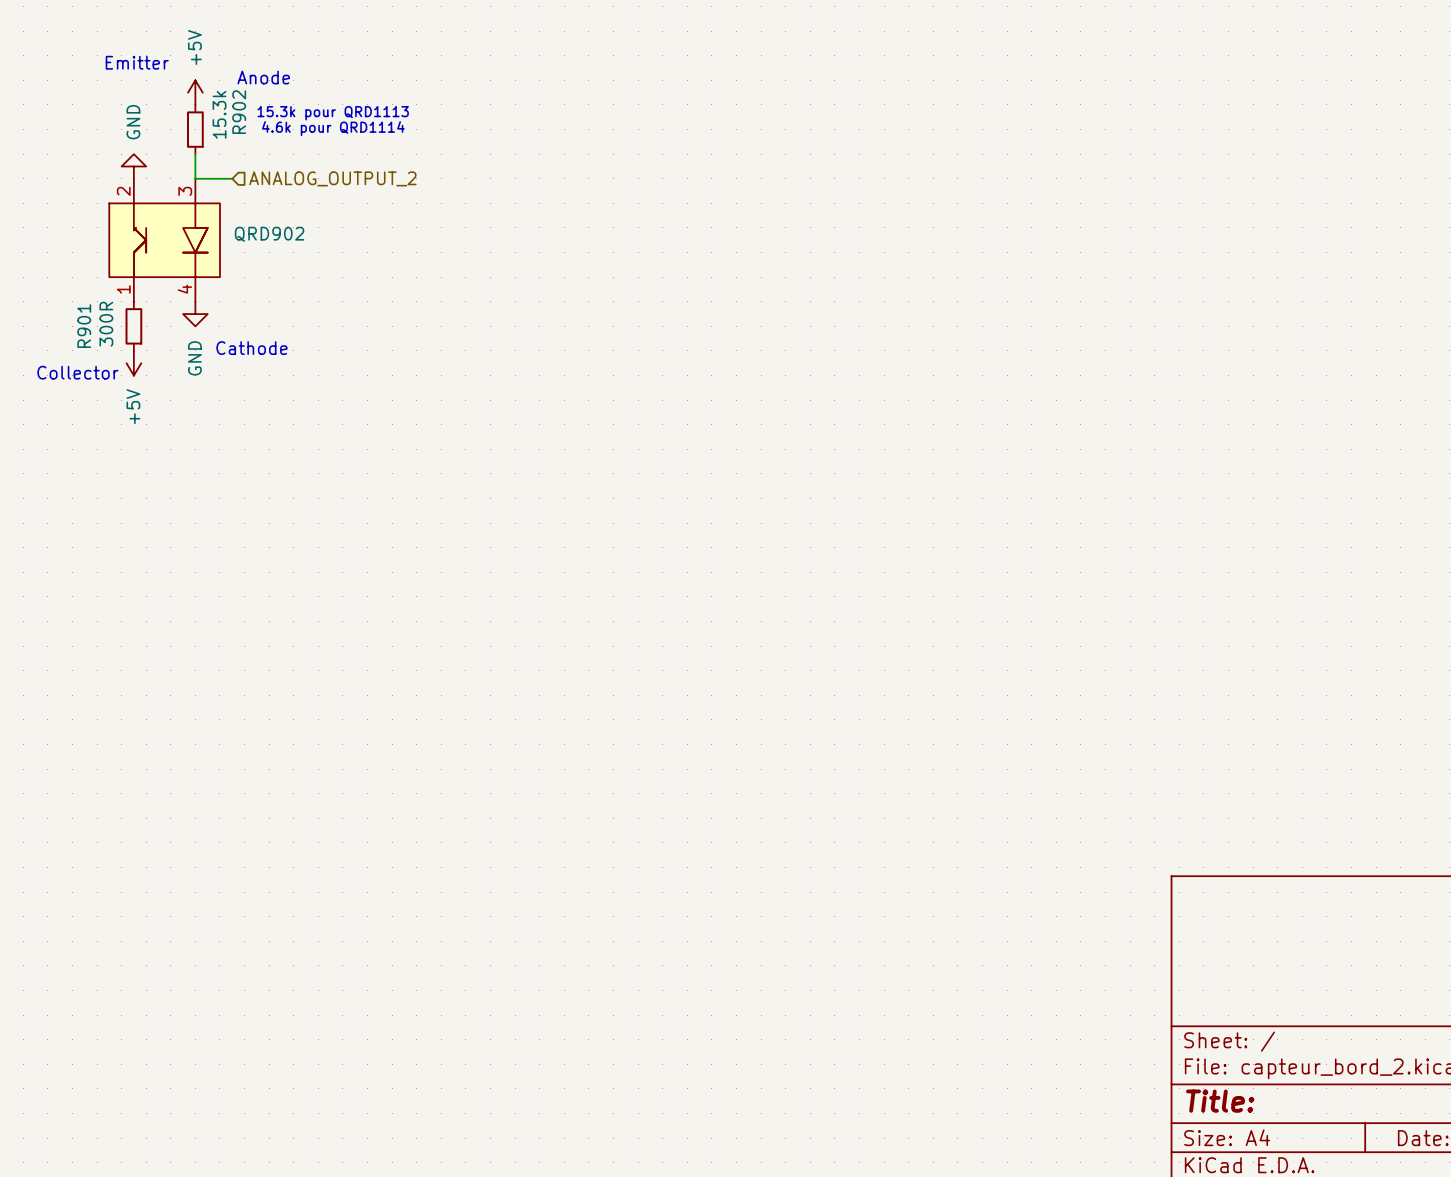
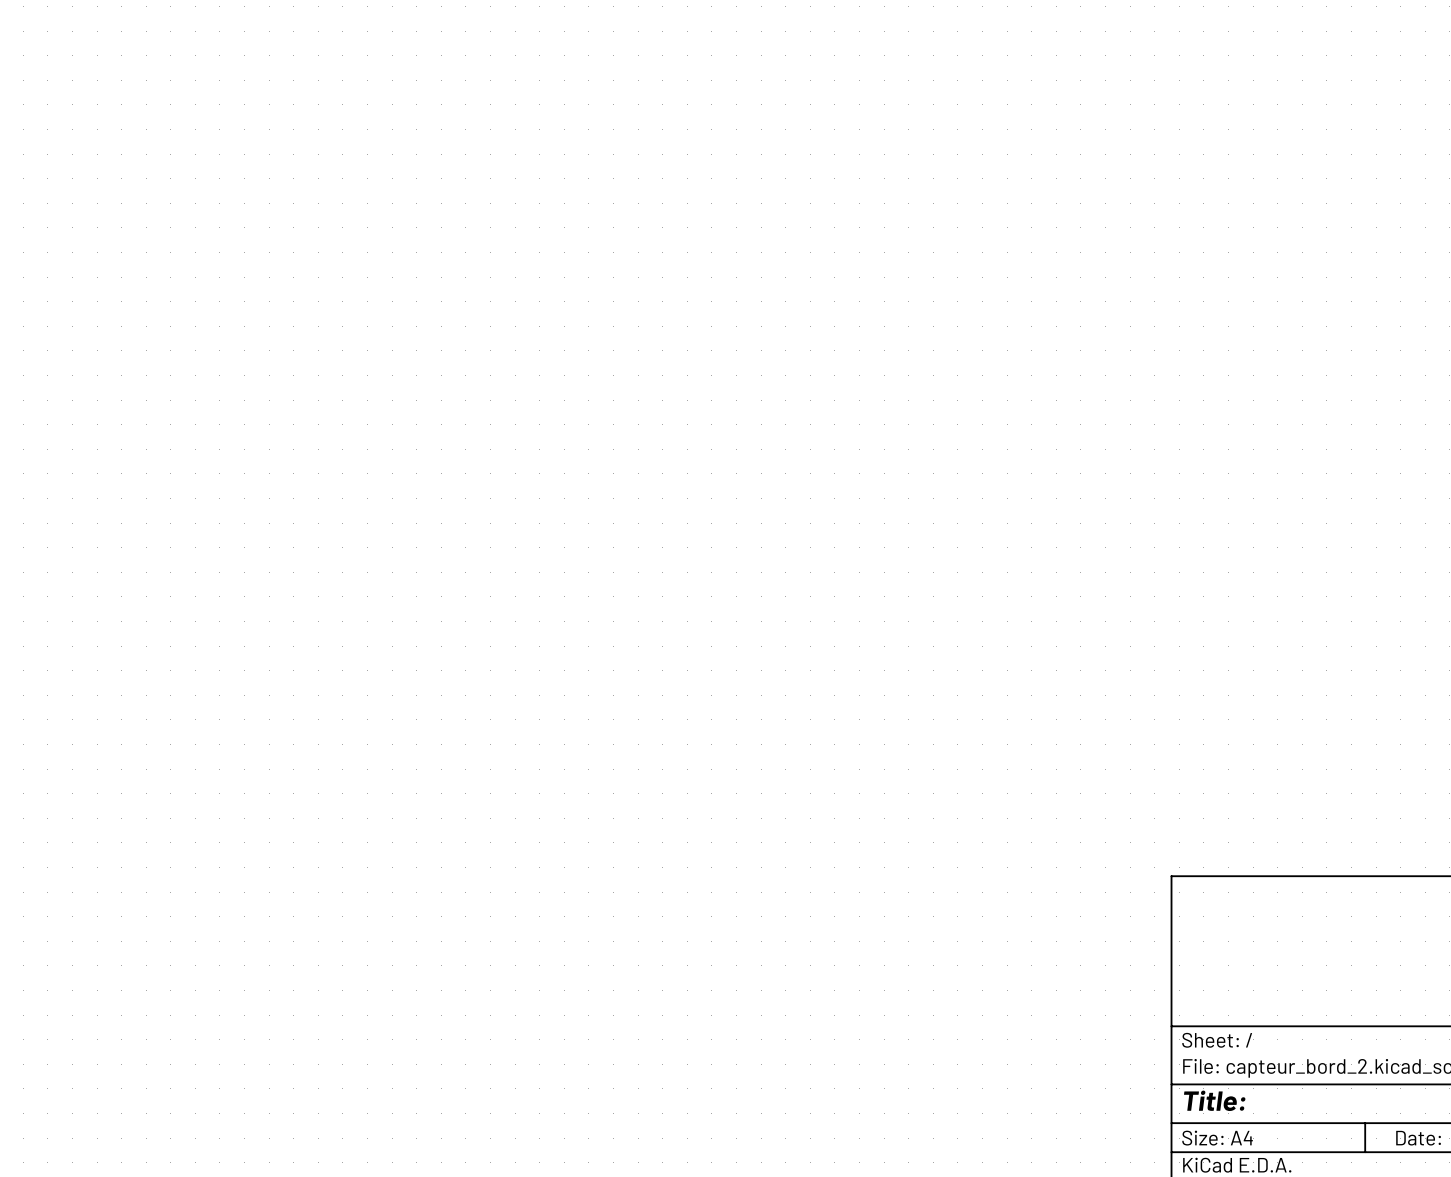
text: Emitter (137, 62) -> none
text: Anode (263, 77) -> none
power symbol: +5V (195, 92) -> none
text: 15.3k pour QRD1113 (333, 113) -> none
text: 4.6k pour QRD1114 (333, 128) -> none
R902: 15.3k (195, 129) -> none
wire: (195, 154) (195, 178) (232, 178) -> none
power symbol: GND (133, 166) -> none
hierarchical label: ANALOG_OUTPUT_2 (332, 178) -> none
QRD902: (164, 240) -> none
power symbol: GND (195, 314) -> none
R901: 300R (133, 326) -> none
text: Cathode (251, 348) -> none
power symbol: +5V (133, 363) -> none
text: Collector (77, 372) -> none

